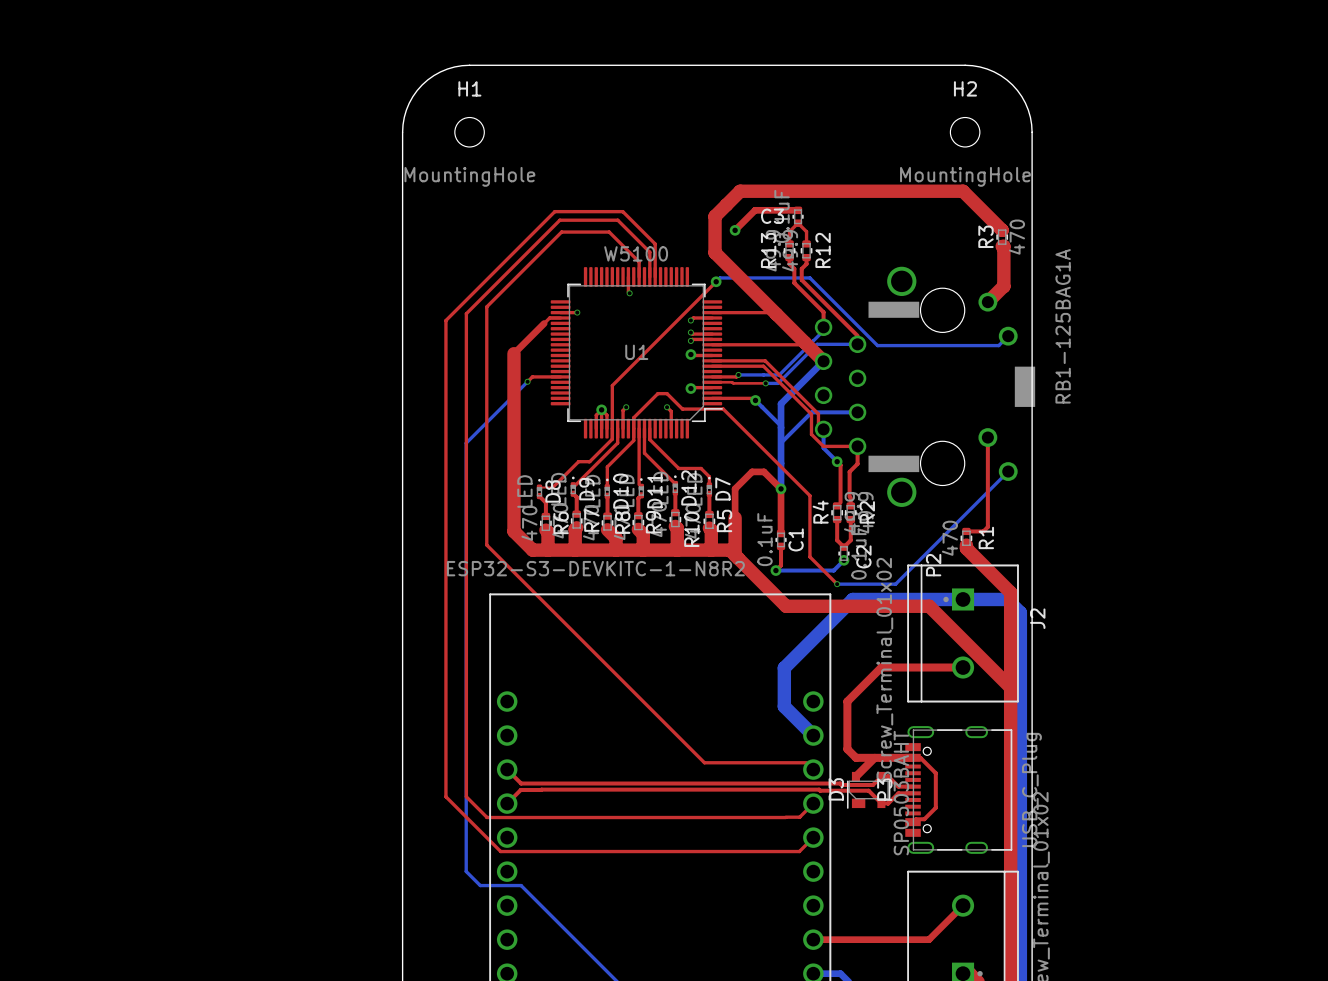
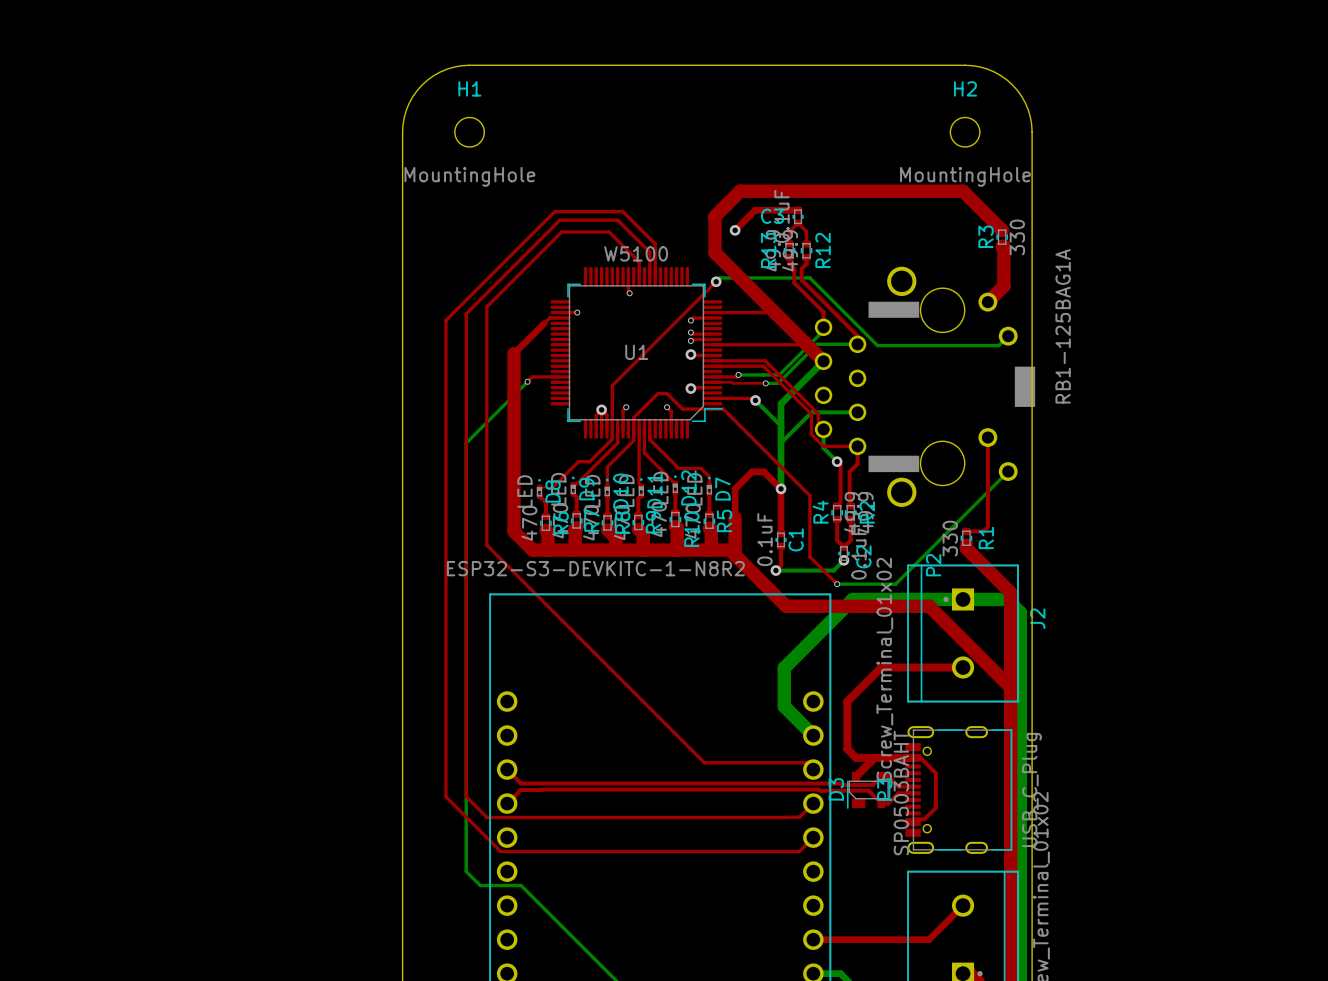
R3 value: 470 (1017, 237) -> 330 (1017, 237)
R1 value: 470 (949, 538) -> 330 (950, 538)

